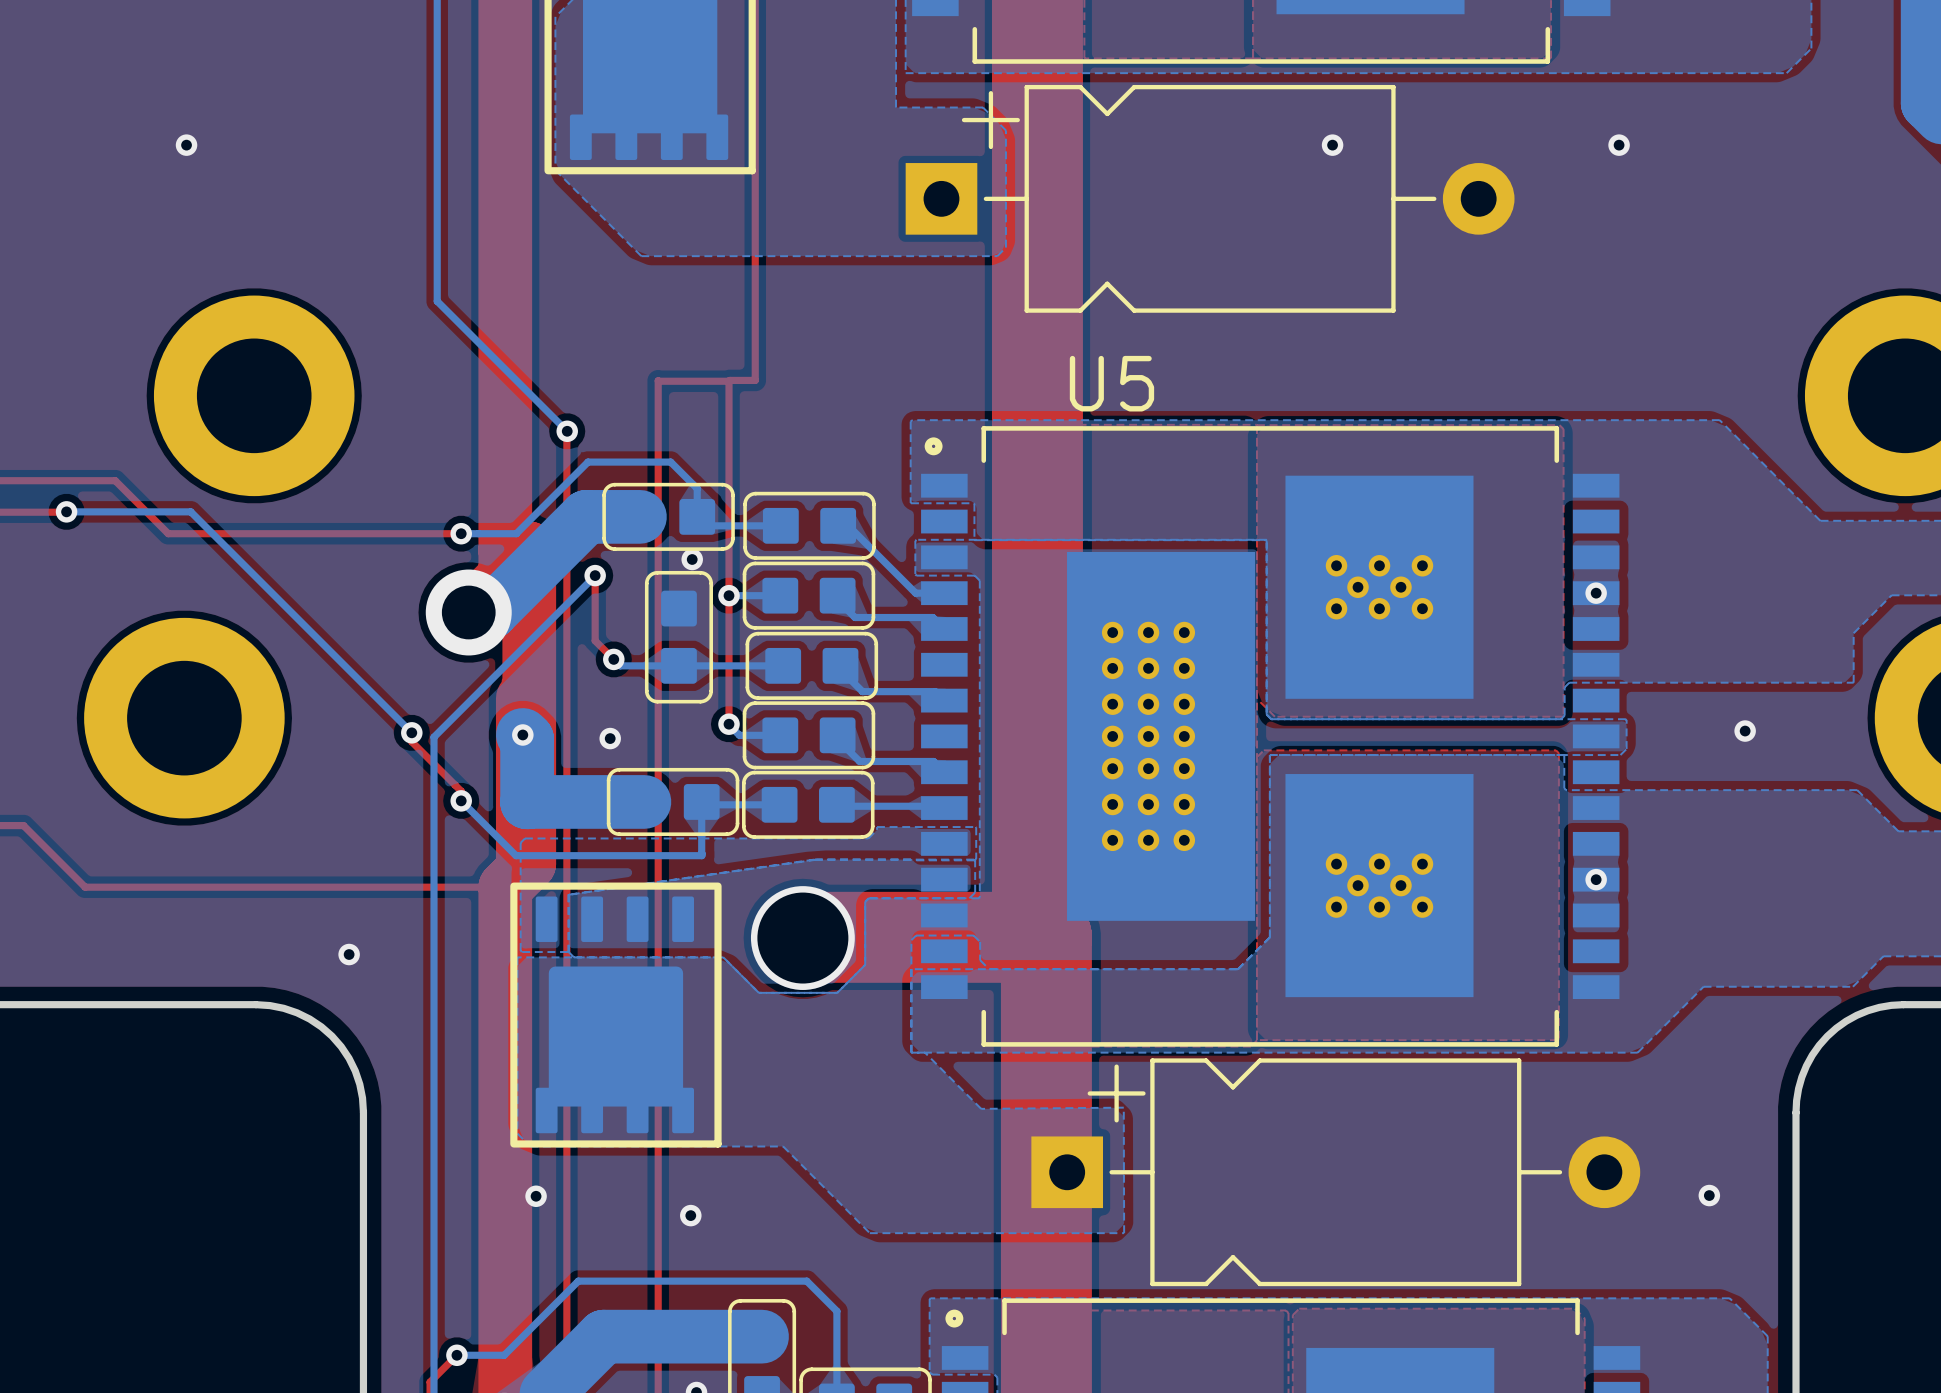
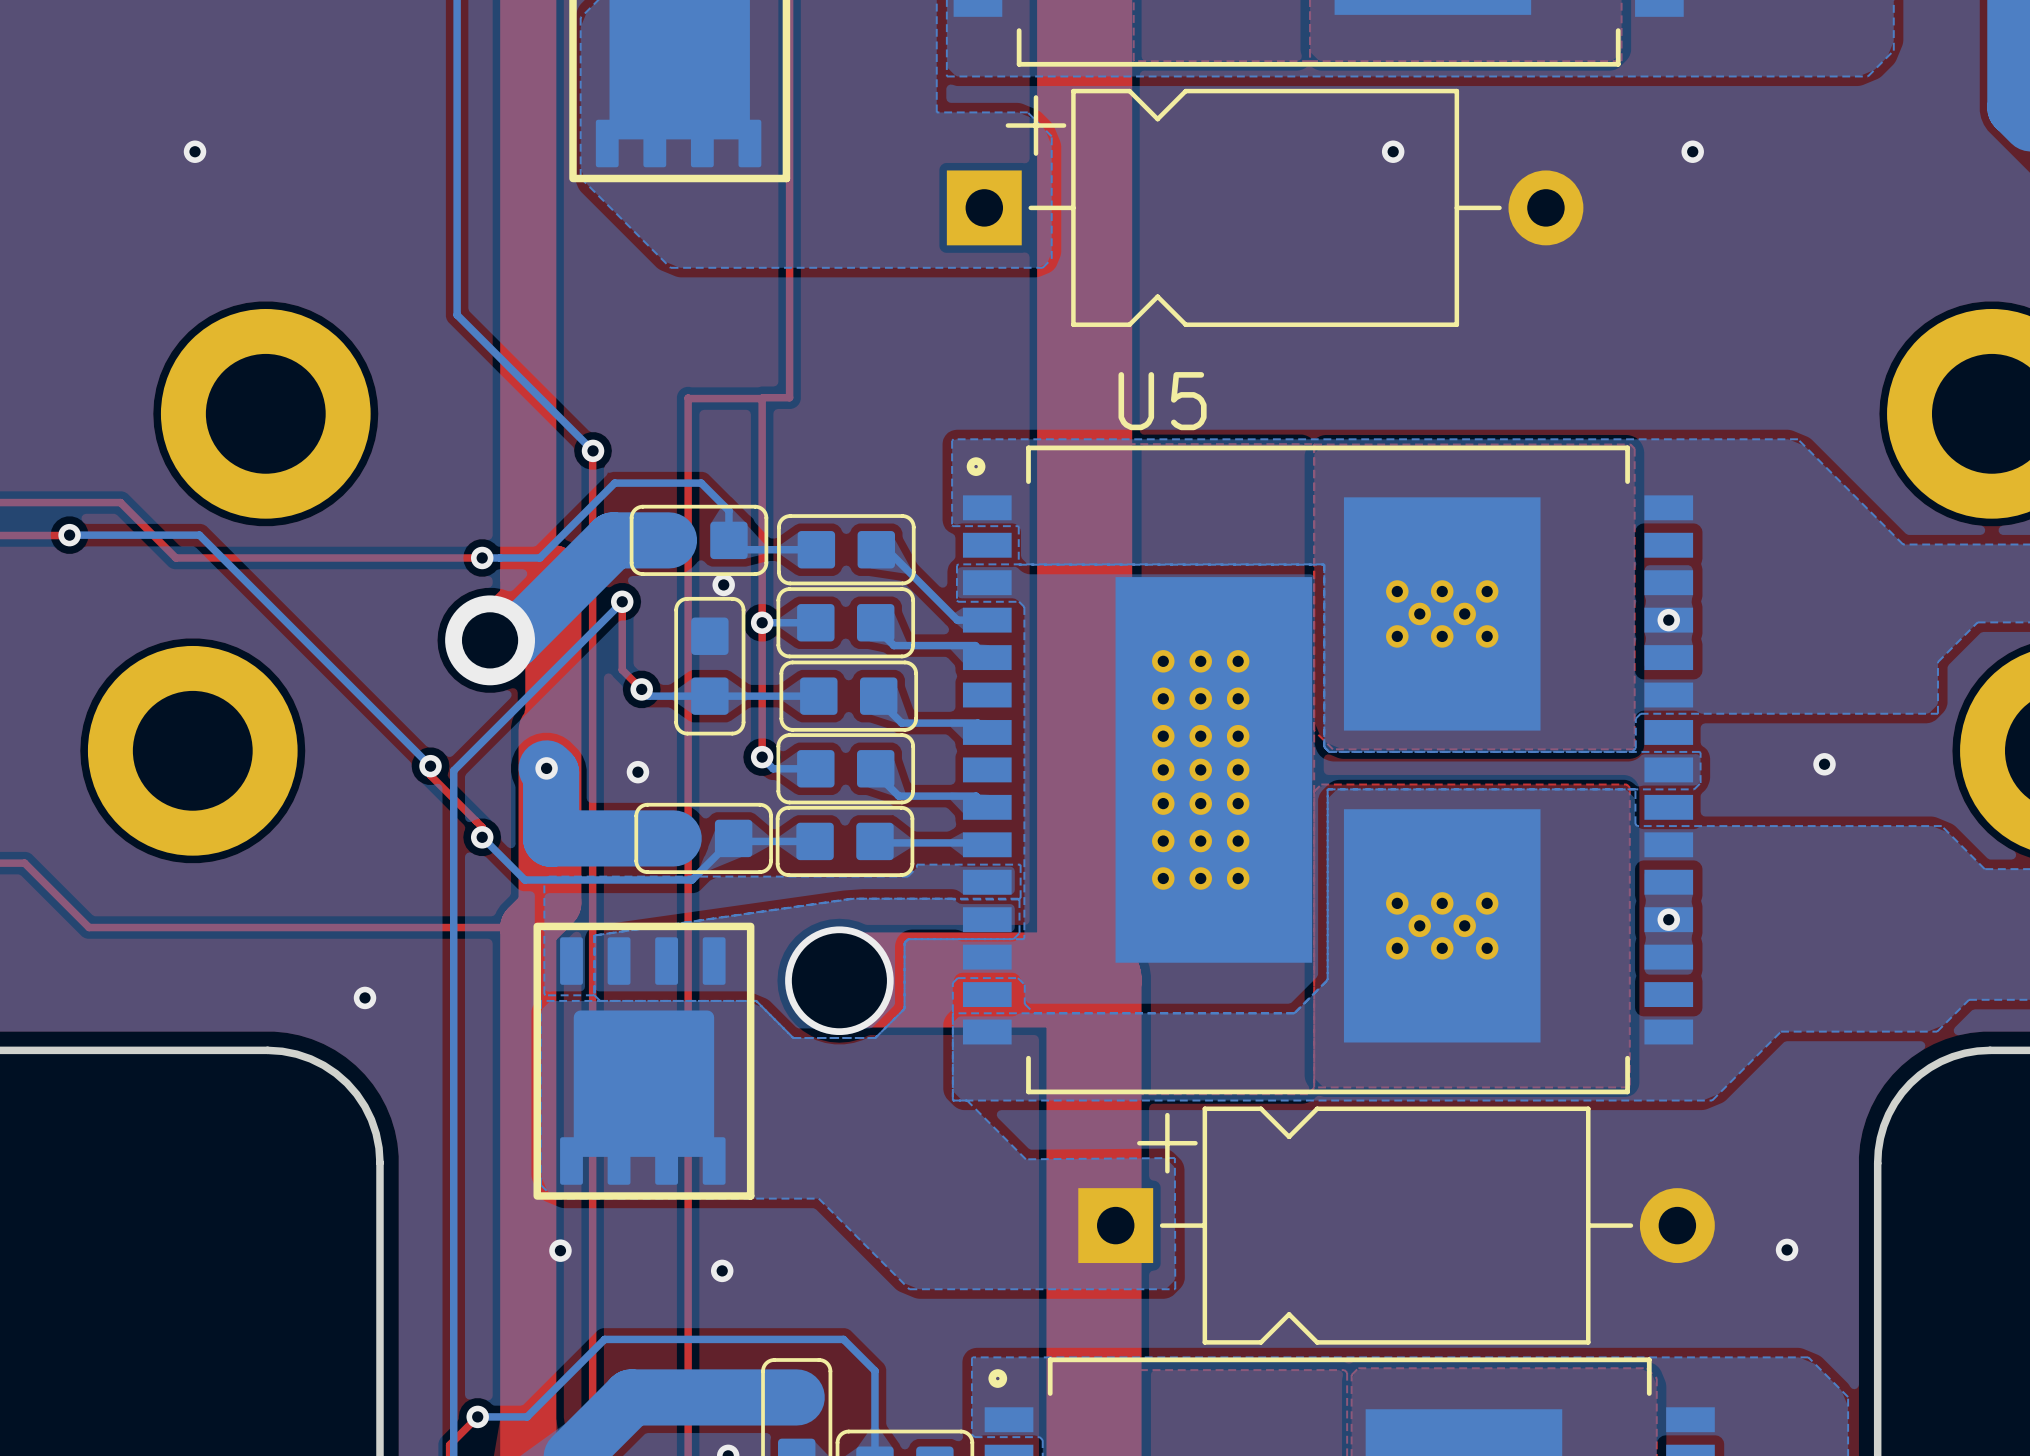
bottom track: (701, 801) (701, 853) -> none
bottom track: (502, 841) (516, 855) (701, 855) (701, 853) -> (524, 879) (692, 879) (733, 838)

